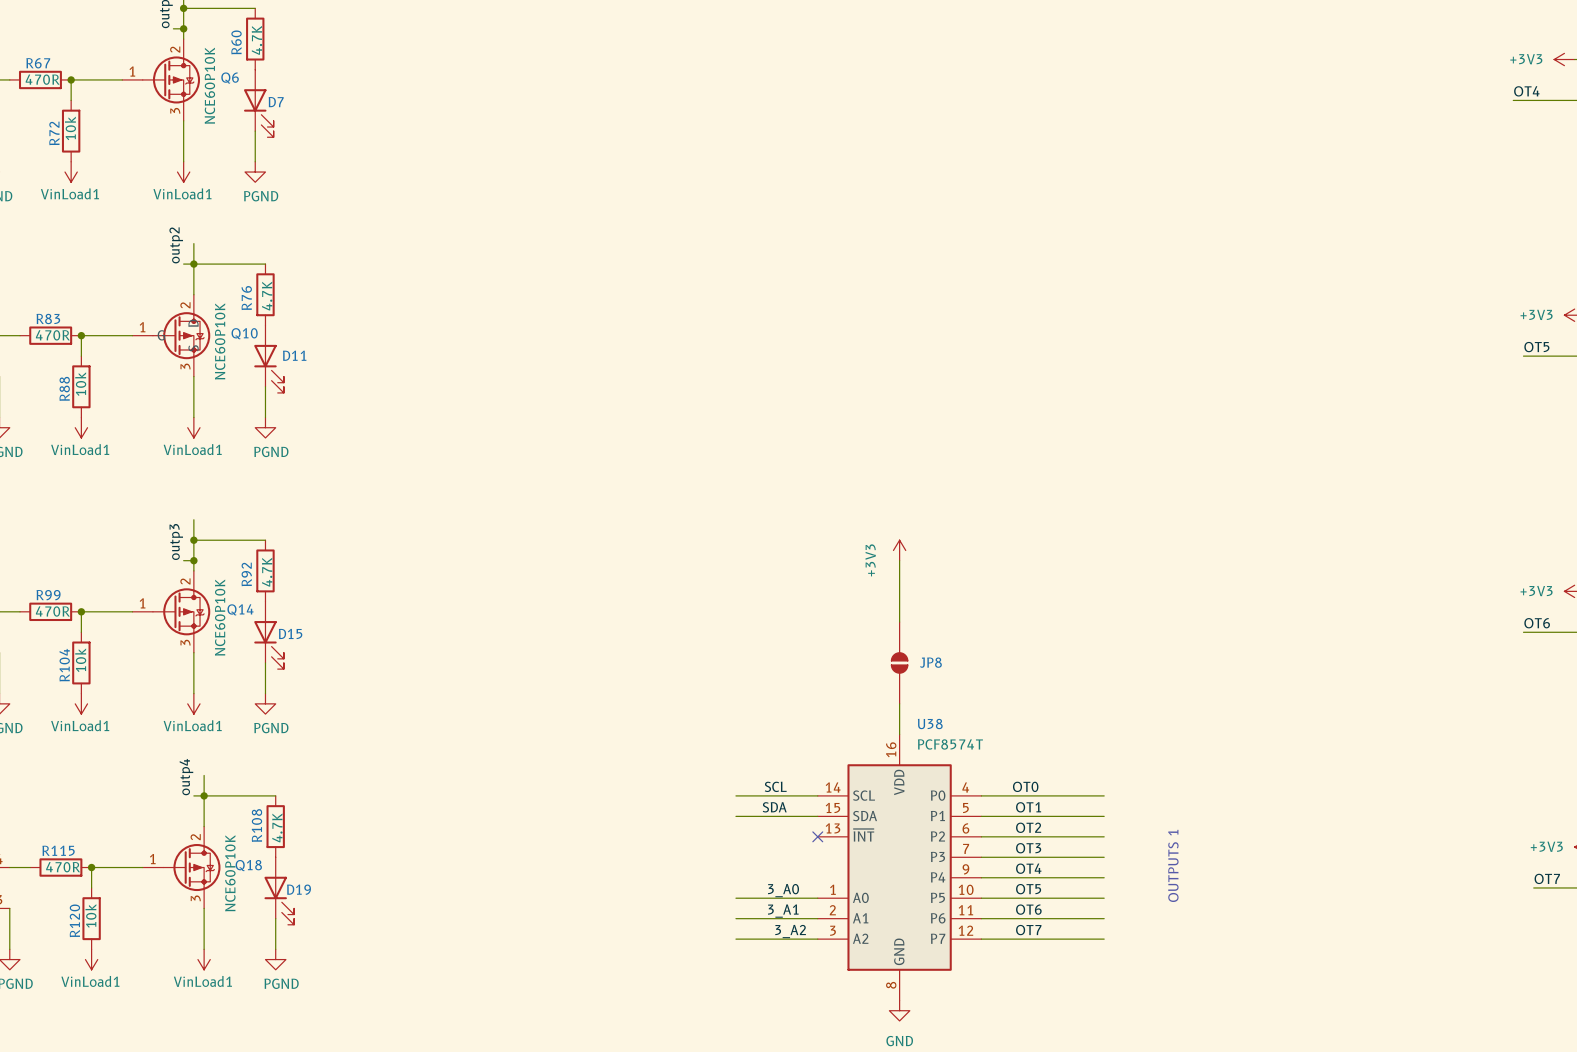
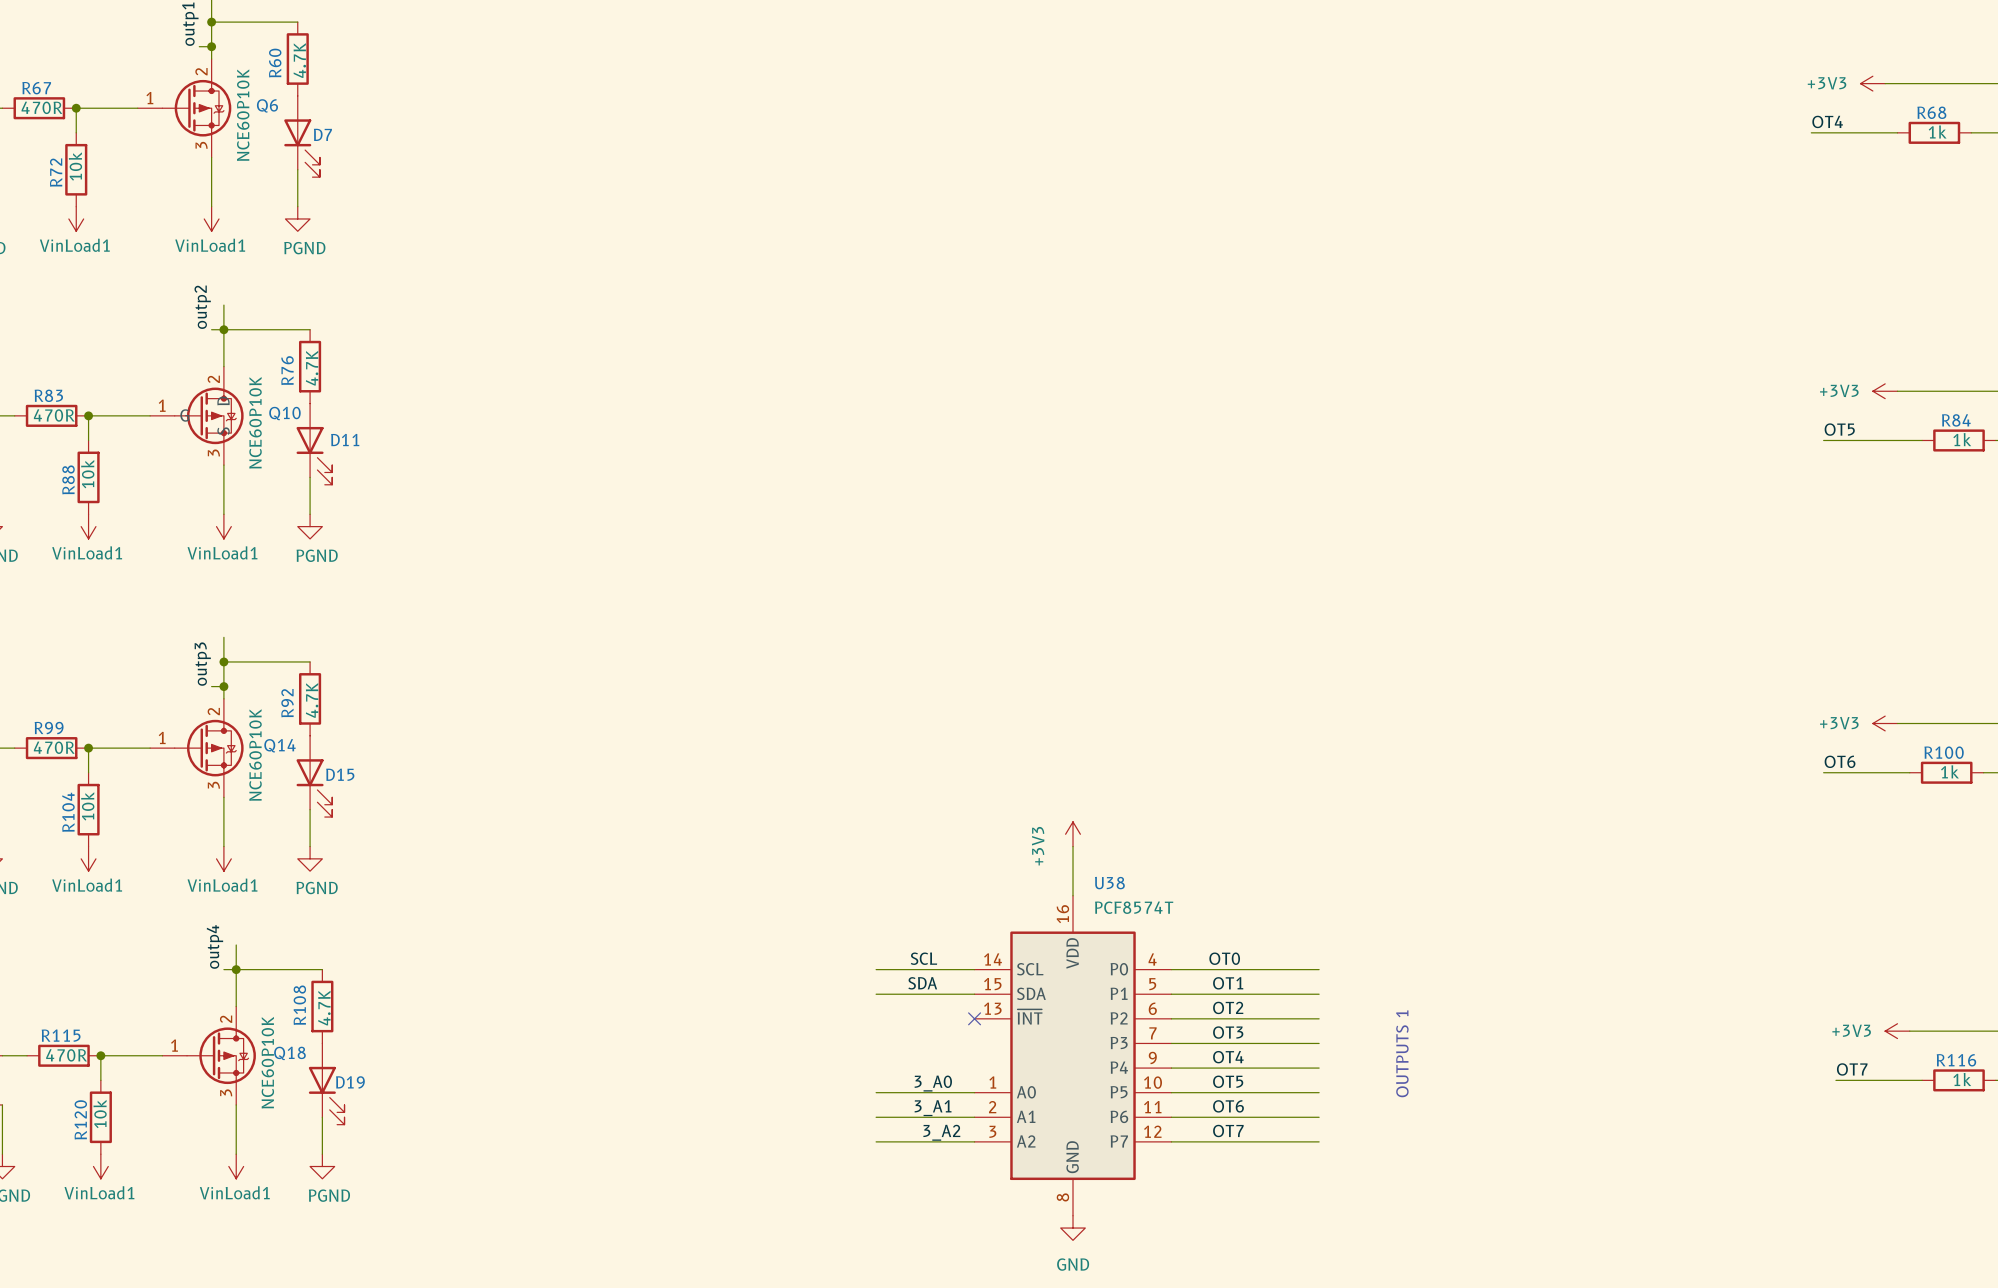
power symbol position: +3V3 (899, 550) -> +3V3 (1073, 834)
wire: (899, 560) (899, 622) -> none
JP8: (899, 662) -> none

